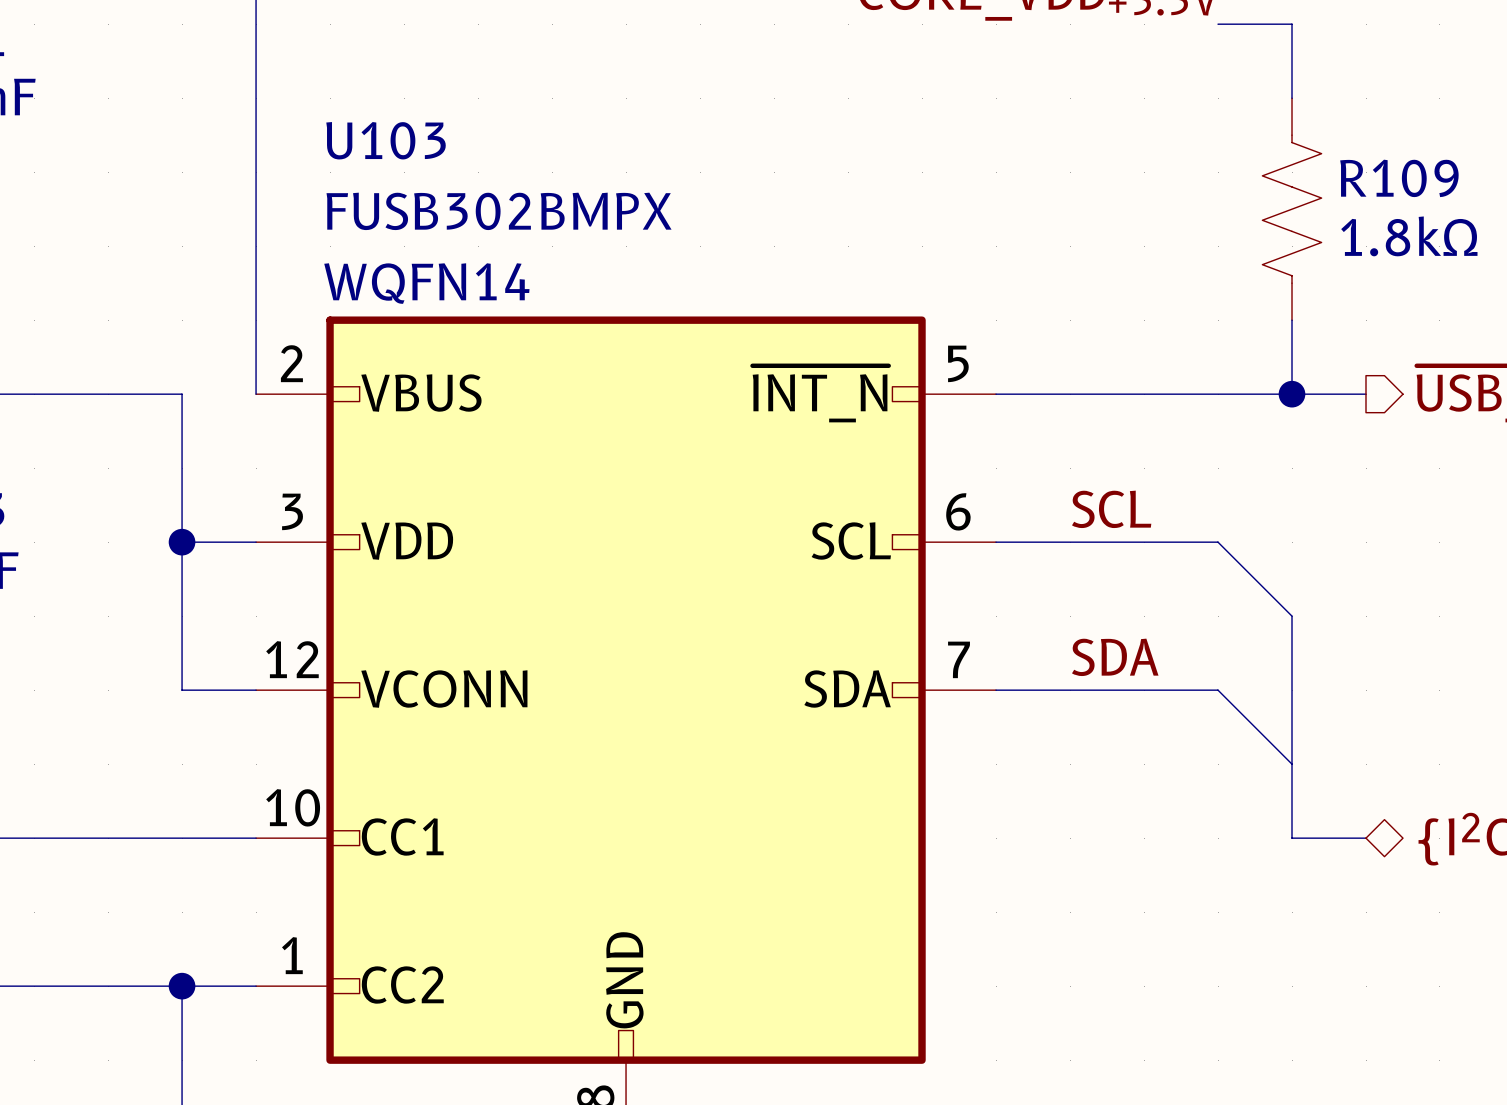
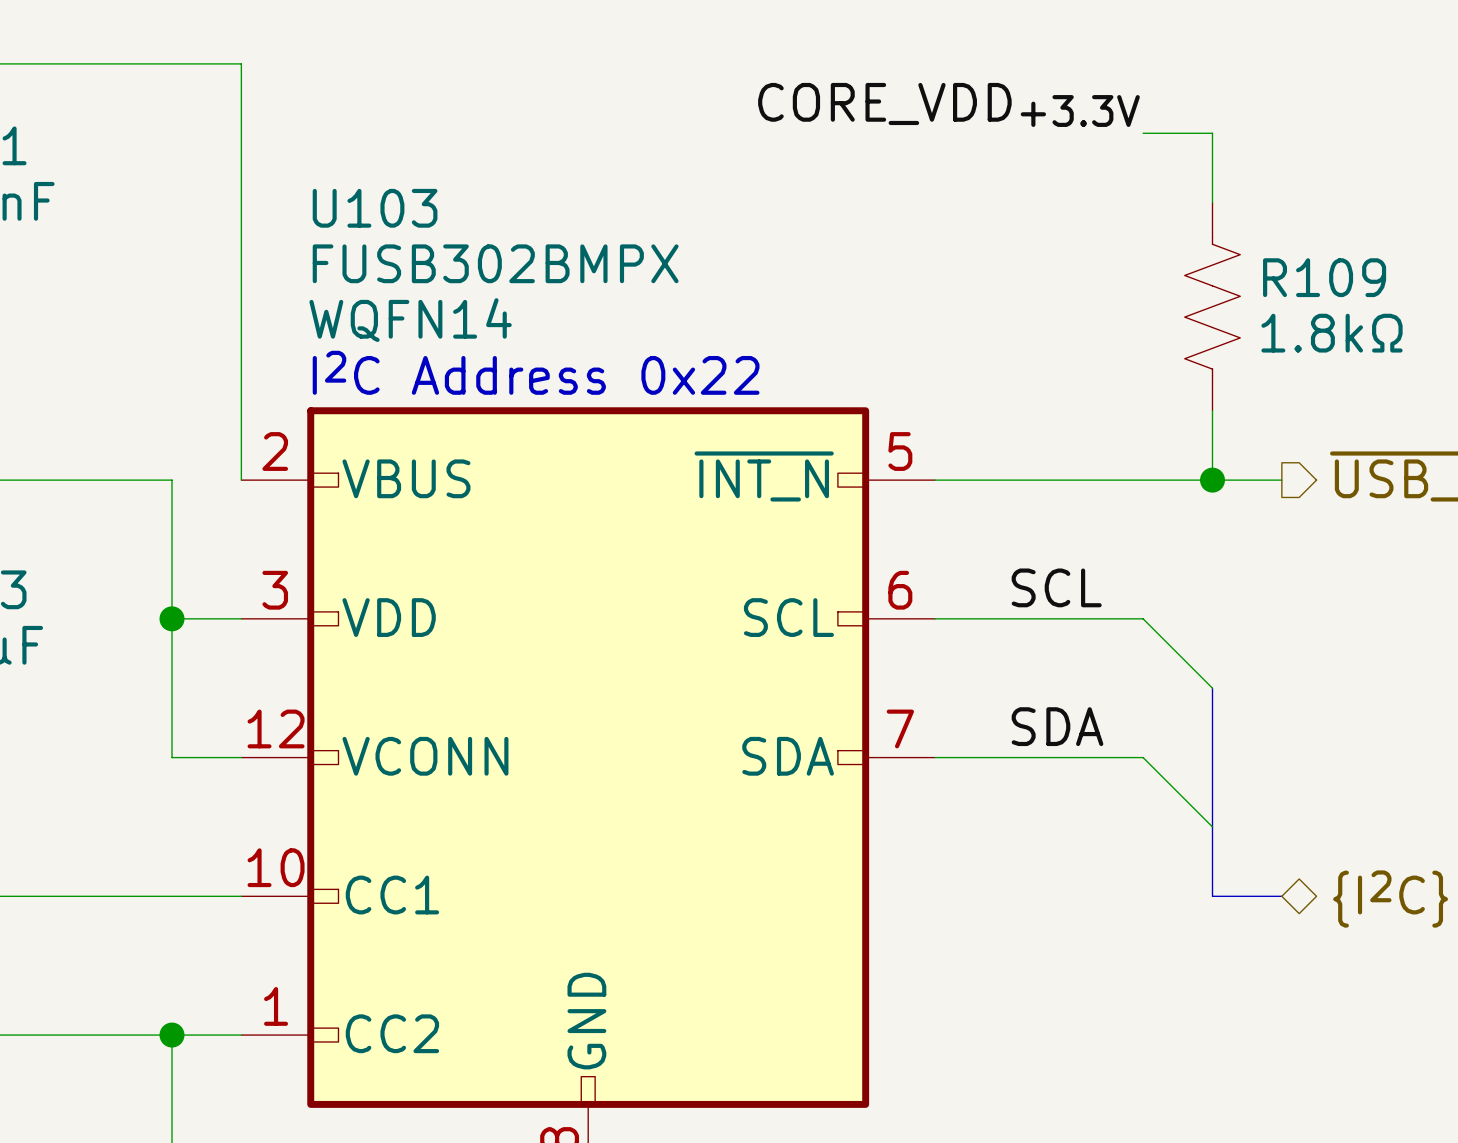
U103 name position: U103 (386, 140) -> U103 (375, 208)
U103 value position: FUSB302BMPX (499, 211) -> FUSB302BMPX (495, 263)
text: none -> I2C Address 0x22 (536, 372)
U103 text position: WQFN14 (426, 283) -> WQFN14 (410, 320)

